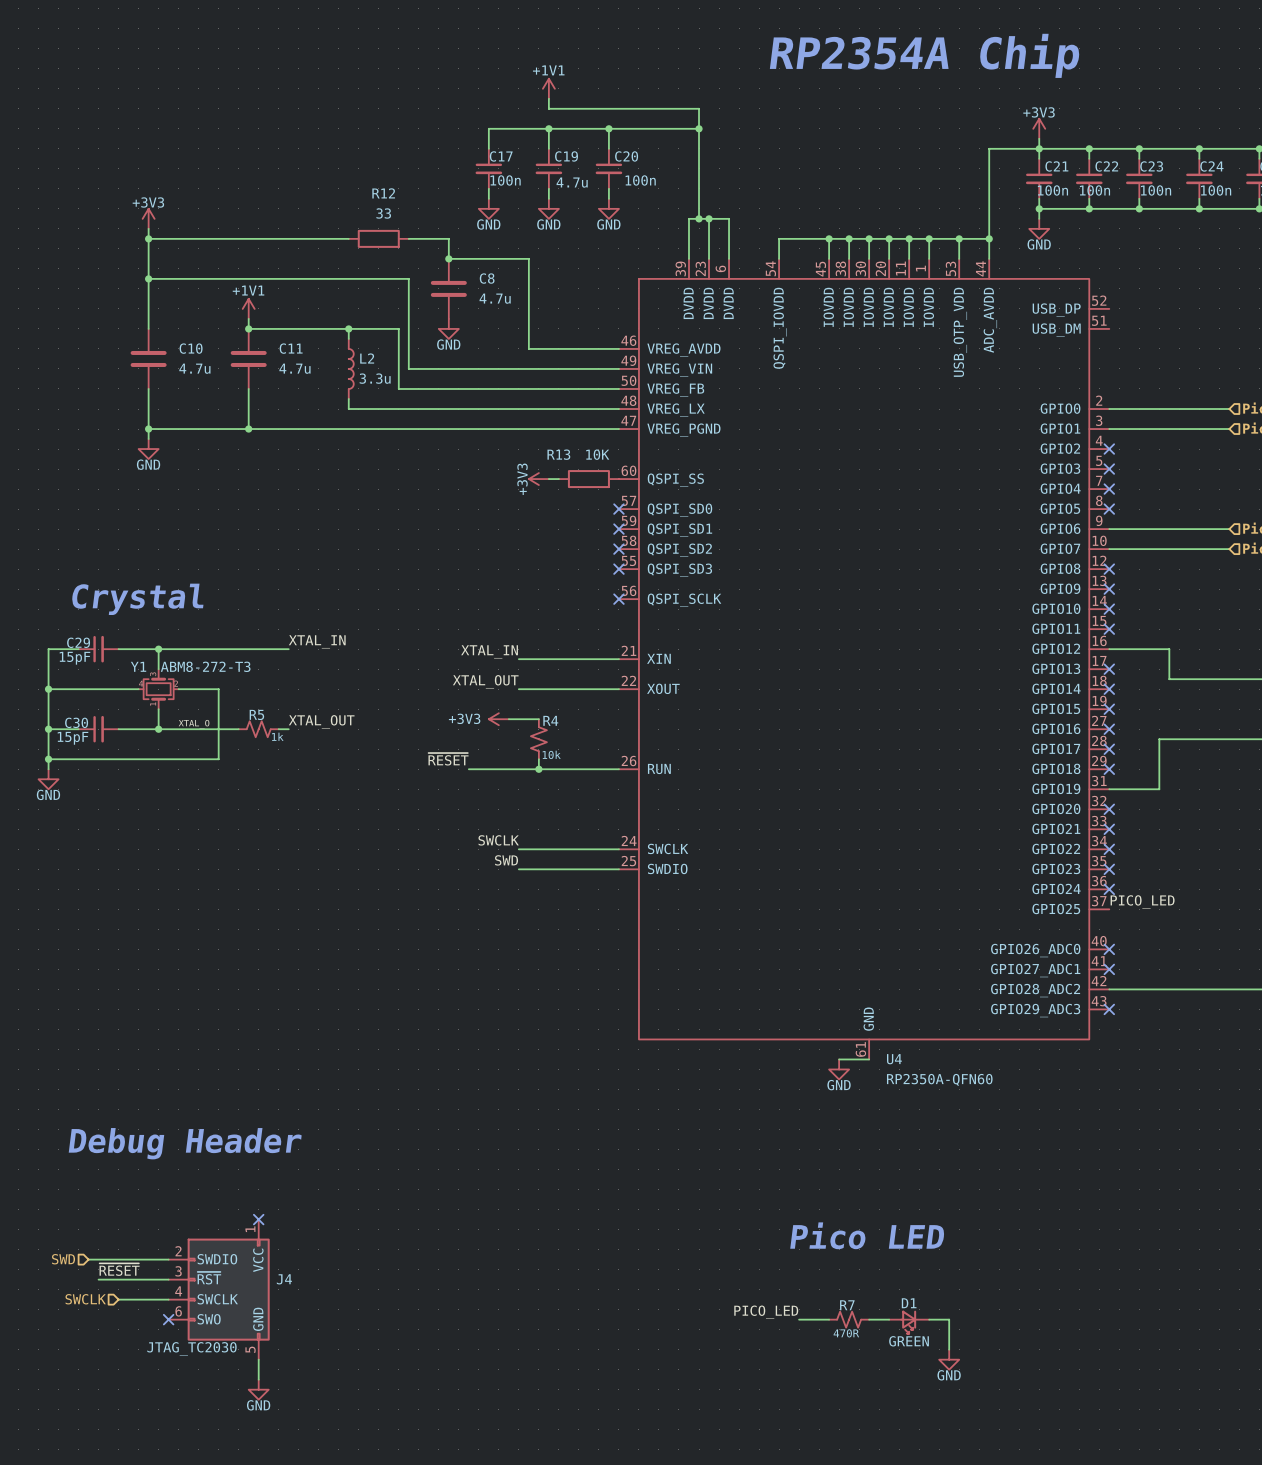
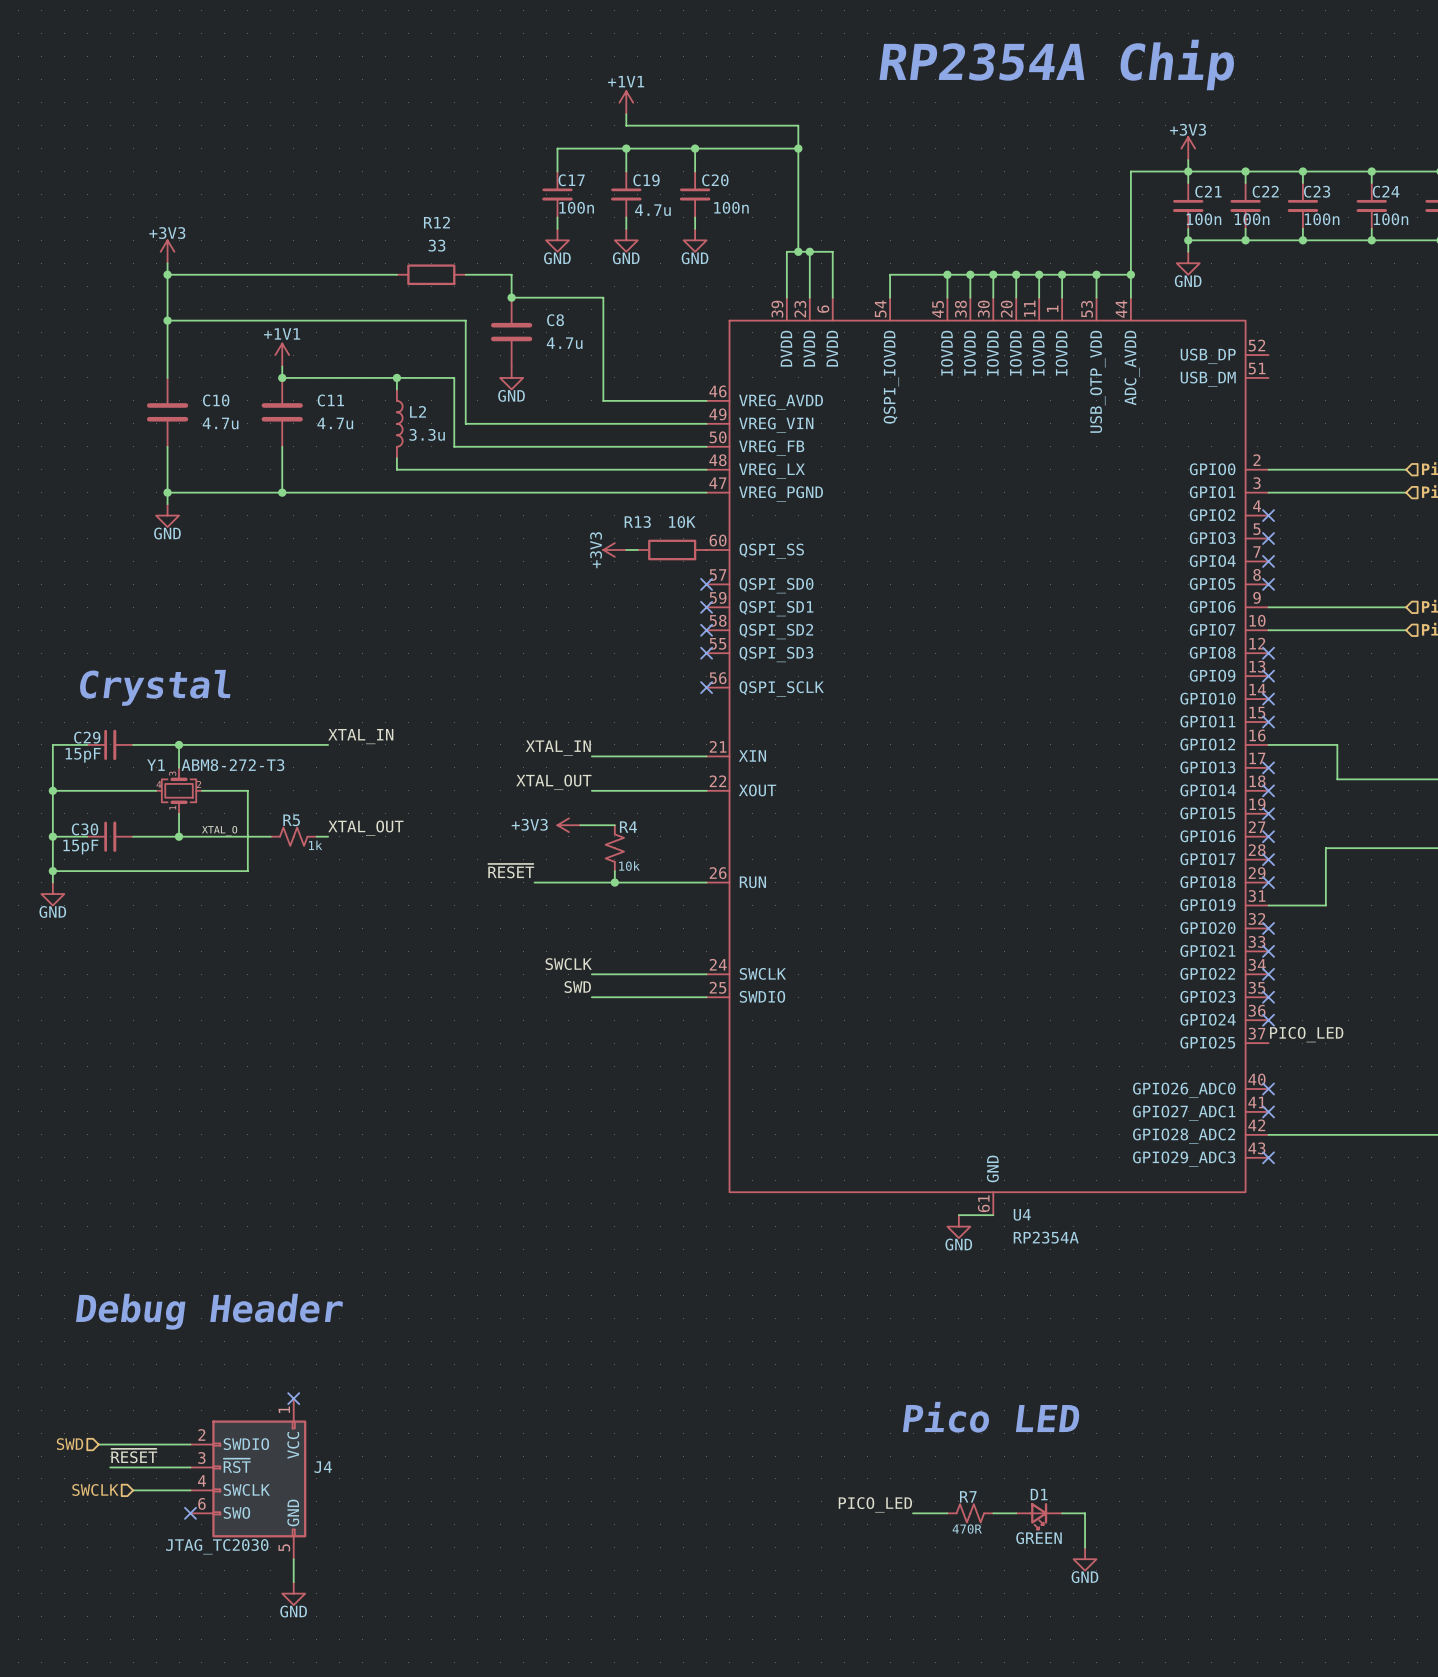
U4 value: RP2350A-QFN60 (939, 1079) -> RP2354A (1046, 1237)

